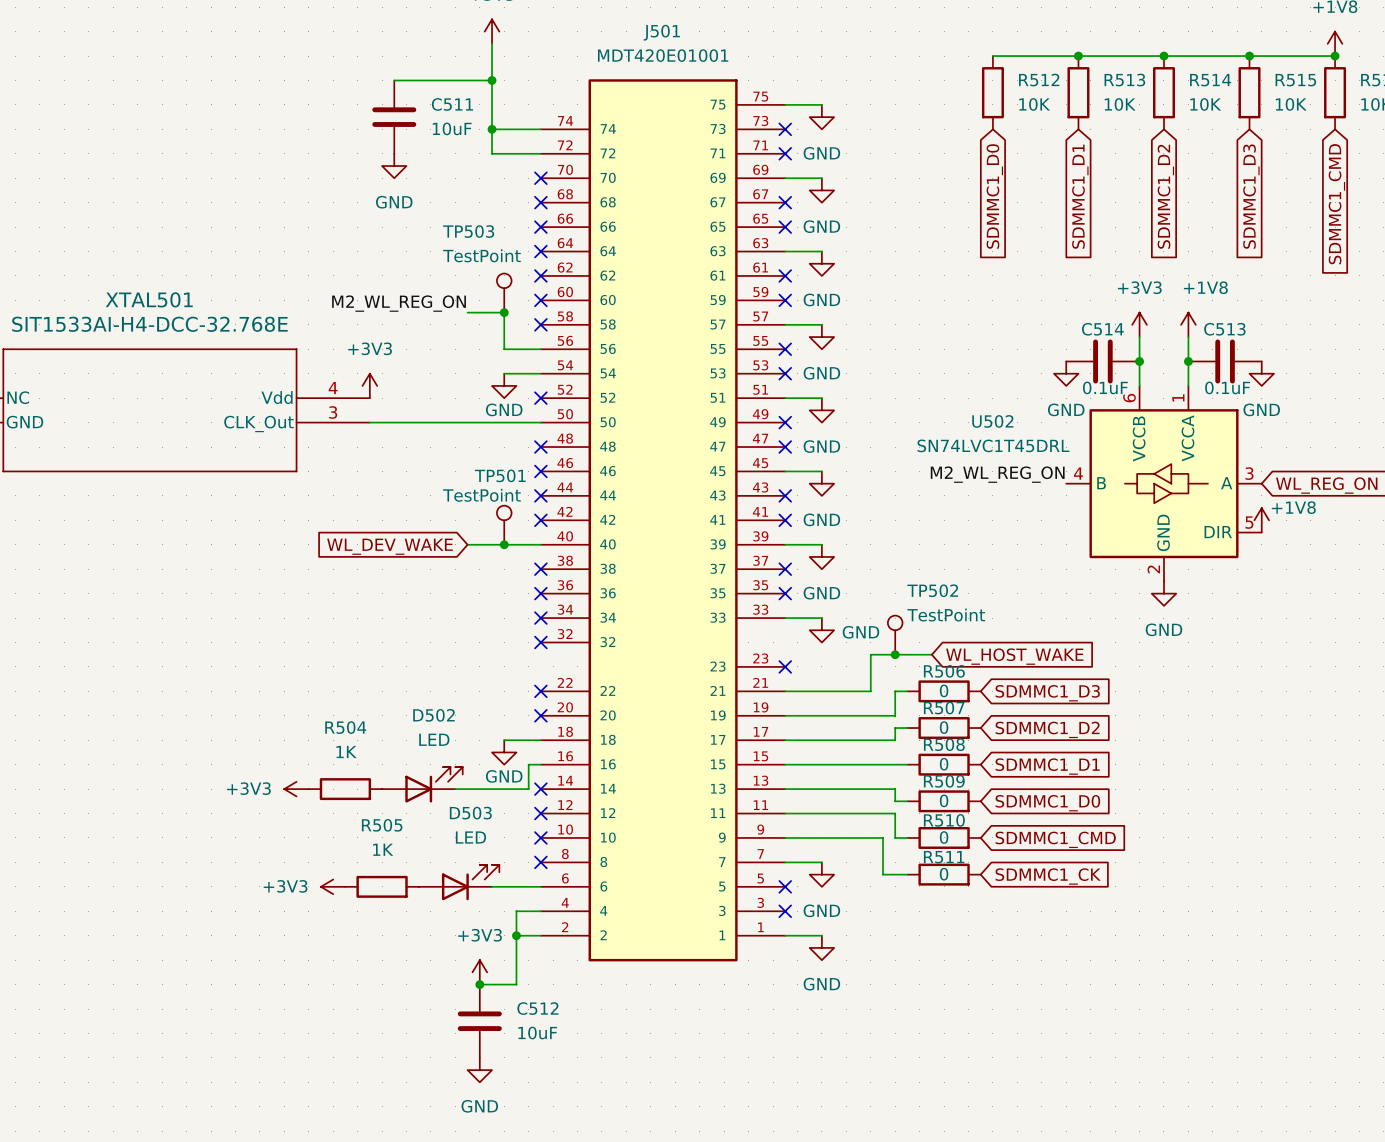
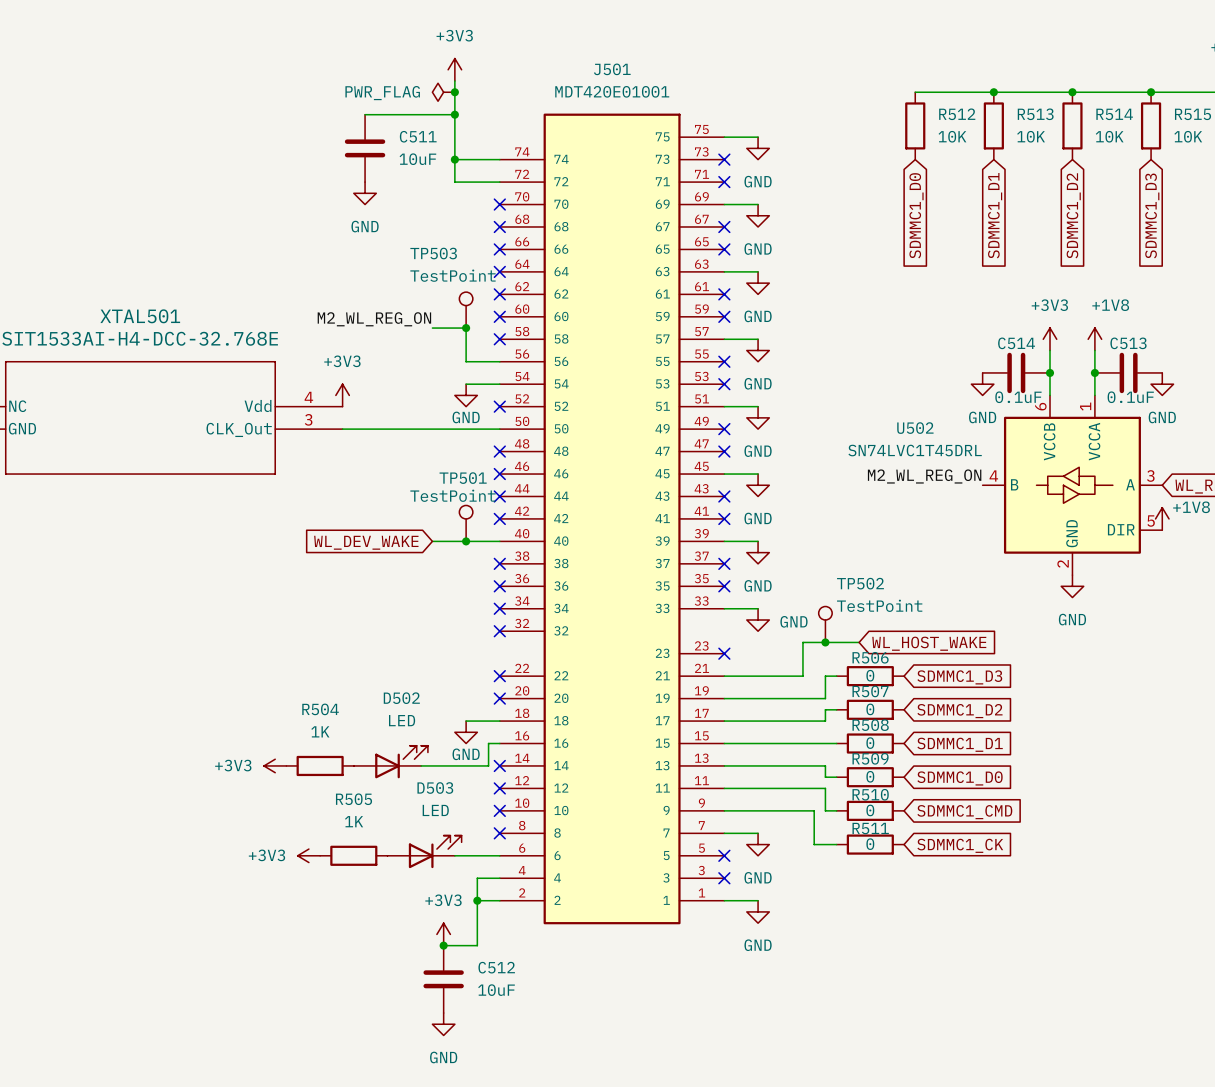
power symbol: none -> PWR_FLAG (443, 92)
junction: none -> (454, 92)

